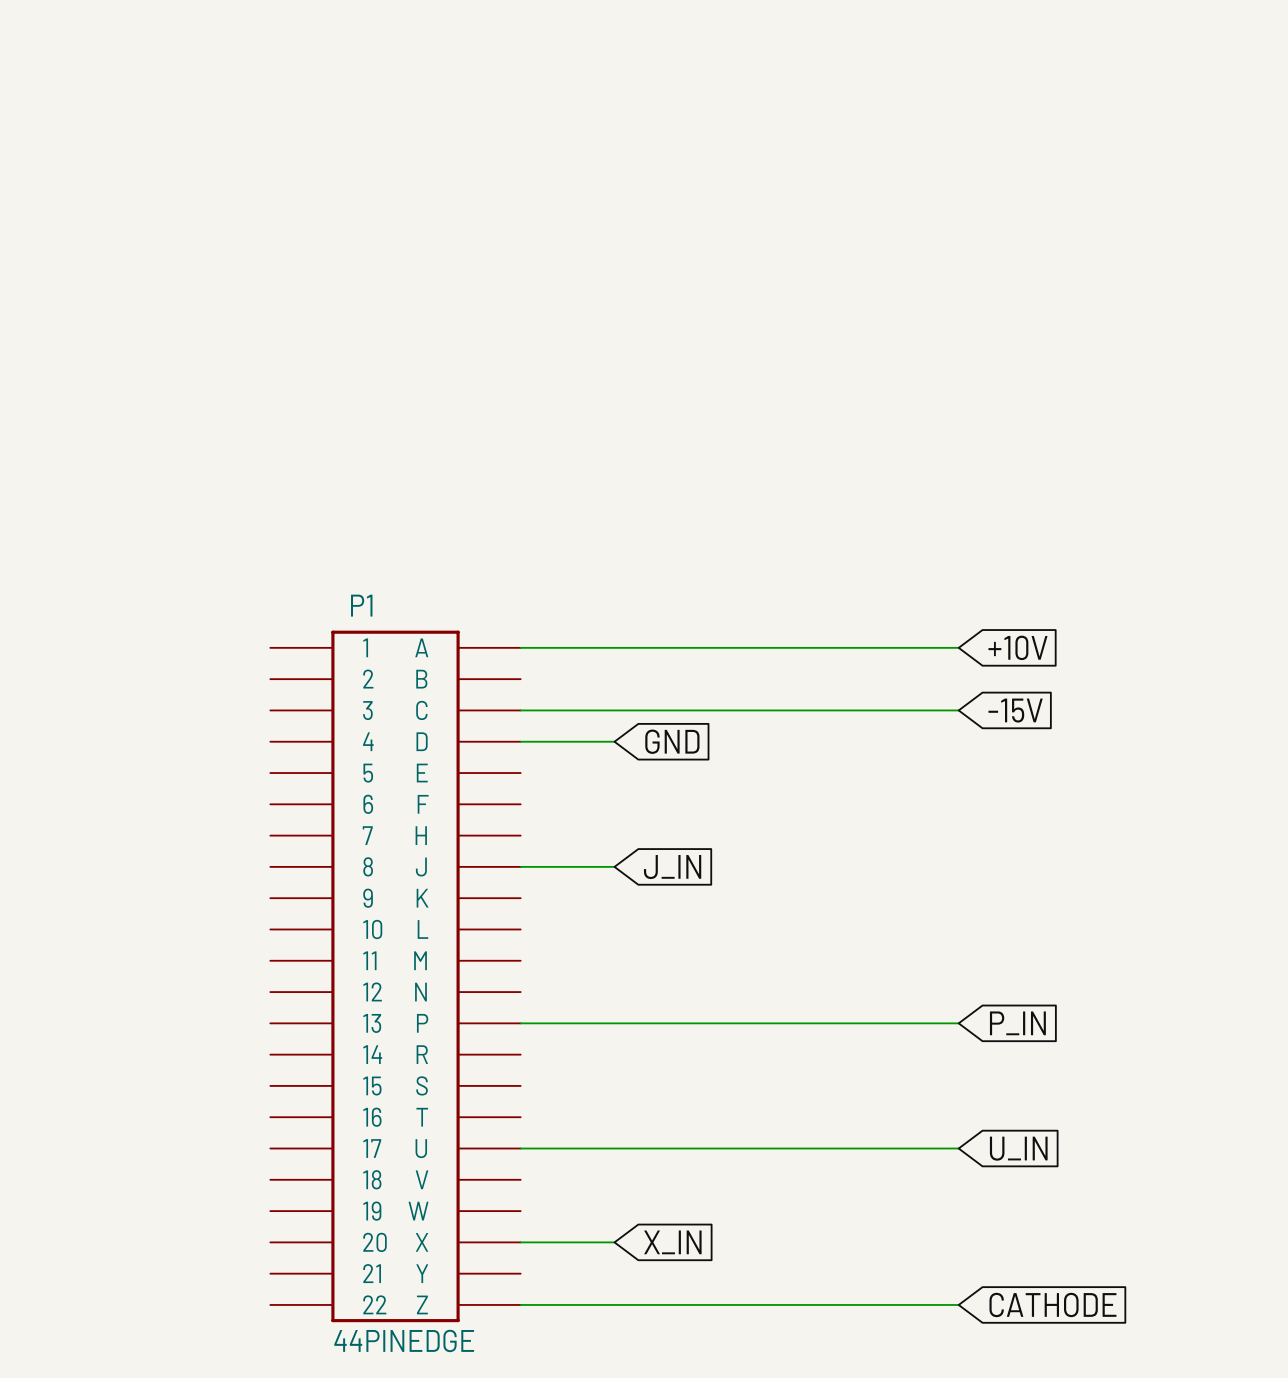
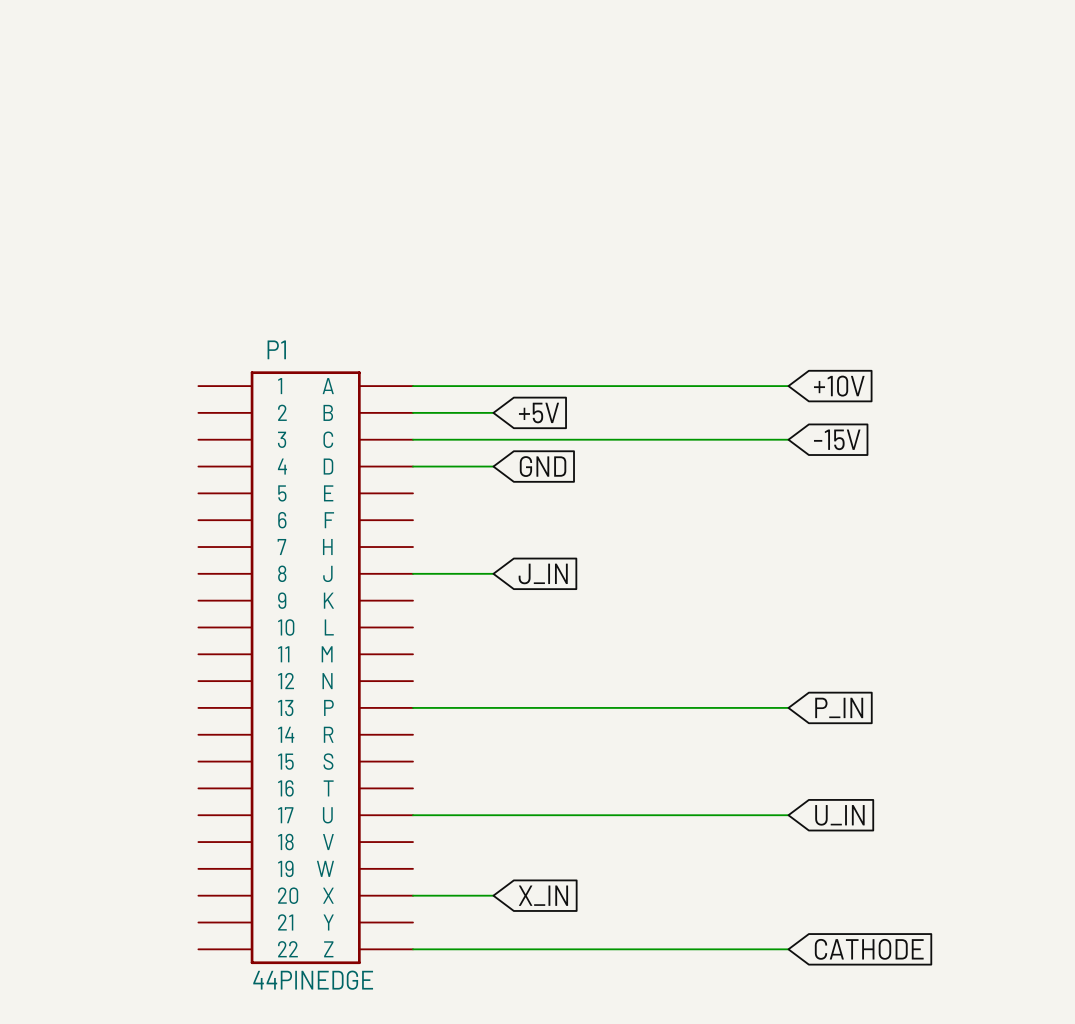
wire: none -> (412, 412) (493, 412)
global label: none -> +5V (539, 413)

